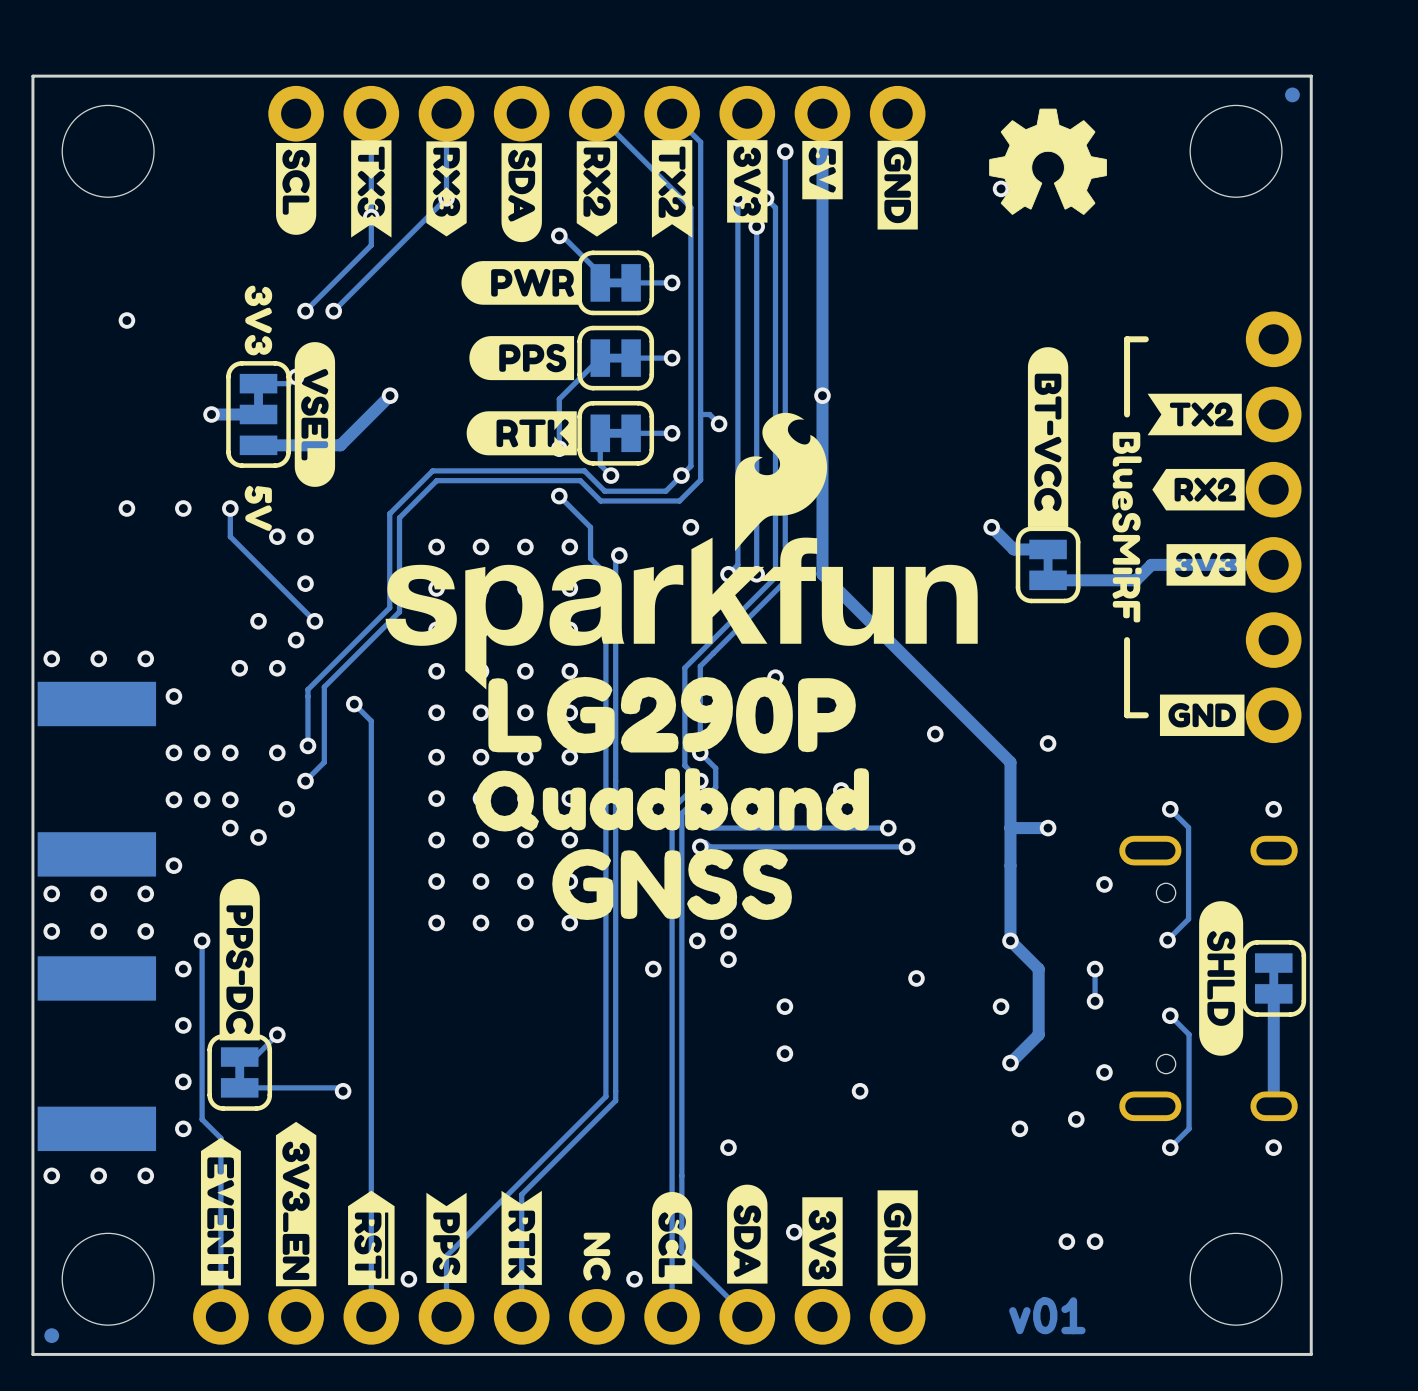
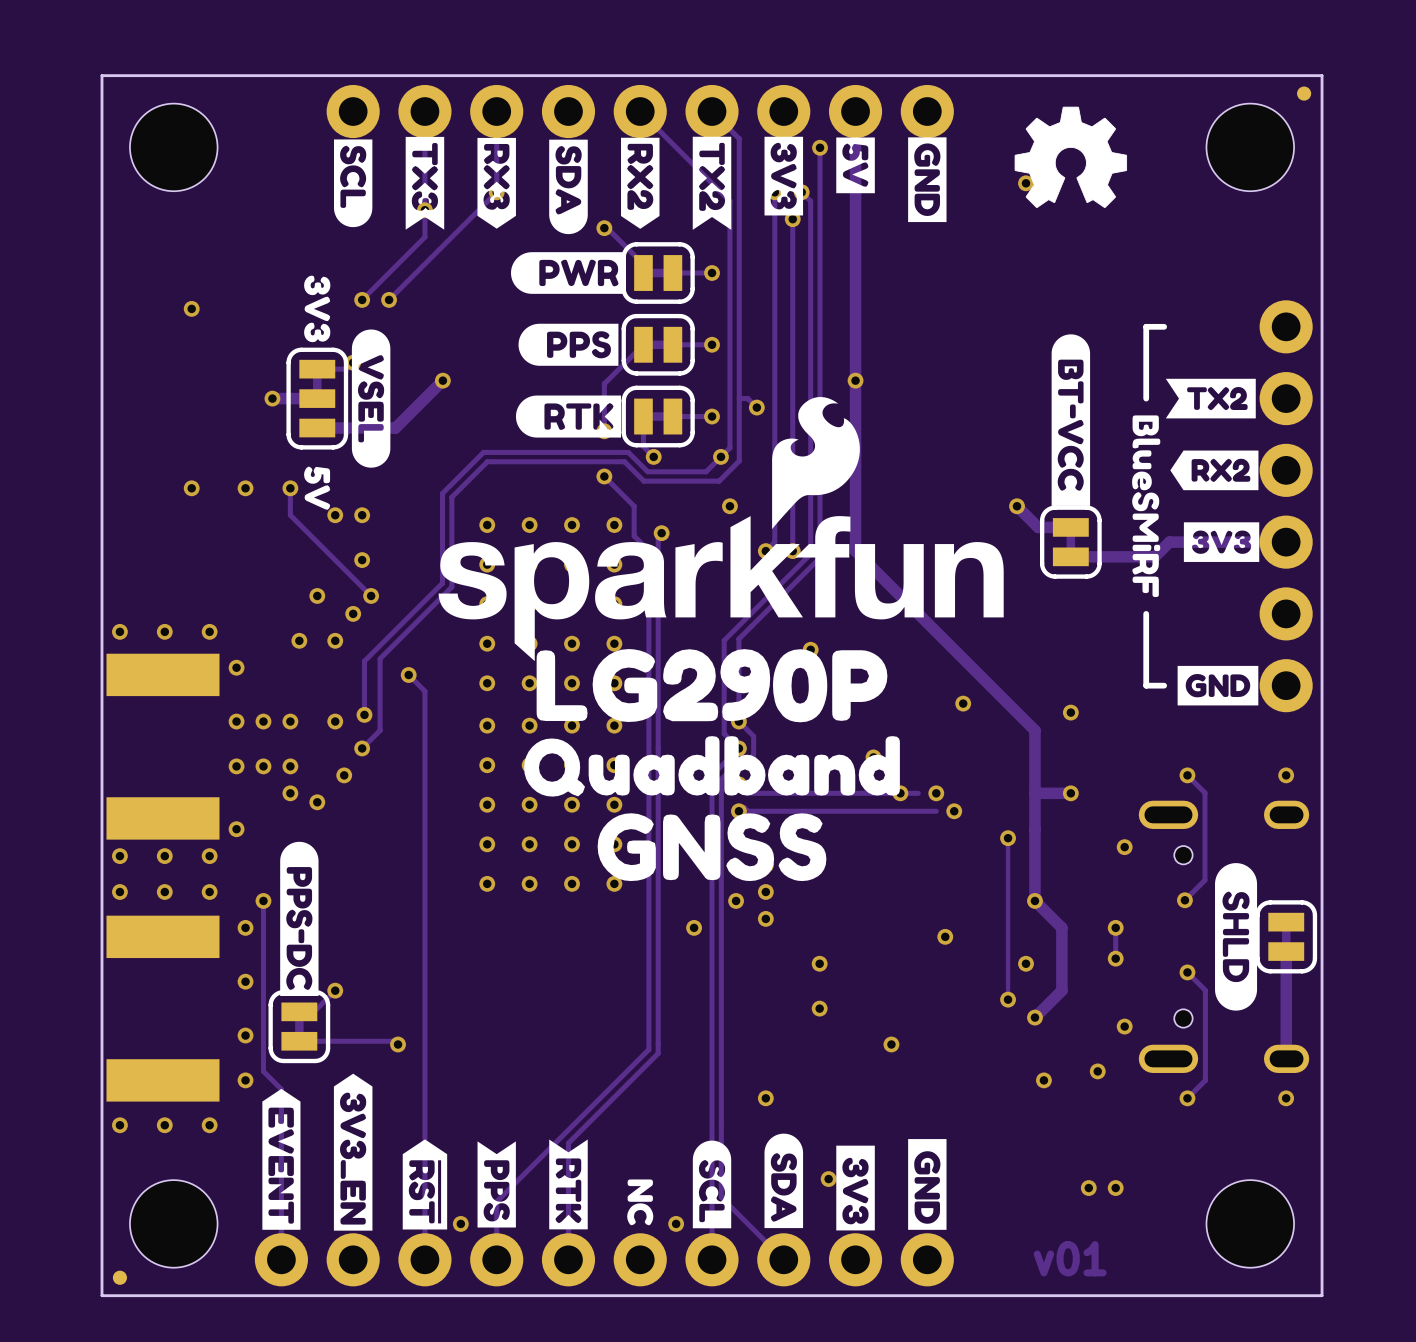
via: none -> (900, 793)
via: (888, 828) -> none
via: none -> (936, 793)
via: (907, 846) -> none
via: none -> (954, 811)
track: none -> (1008, 838) (1008, 999)
via: none -> (1008, 838)
via: none -> (1008, 999)

